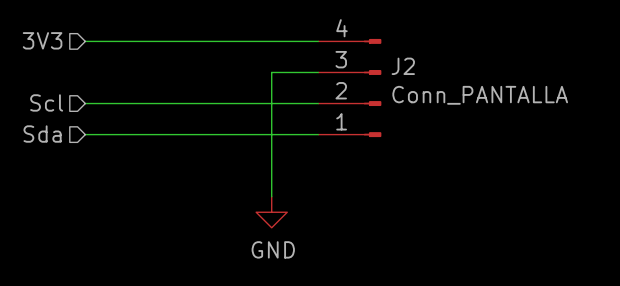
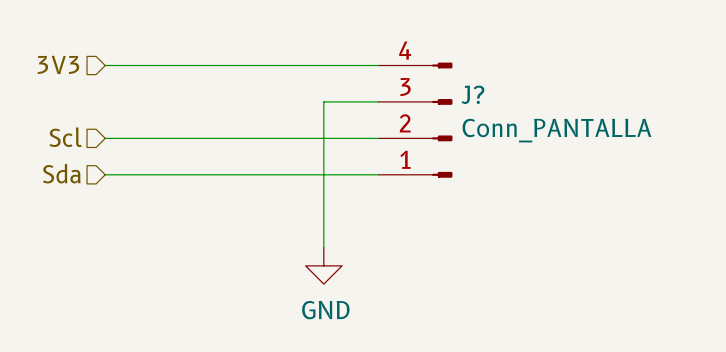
J2 name: J2 (403, 66) -> J? (472, 94)

